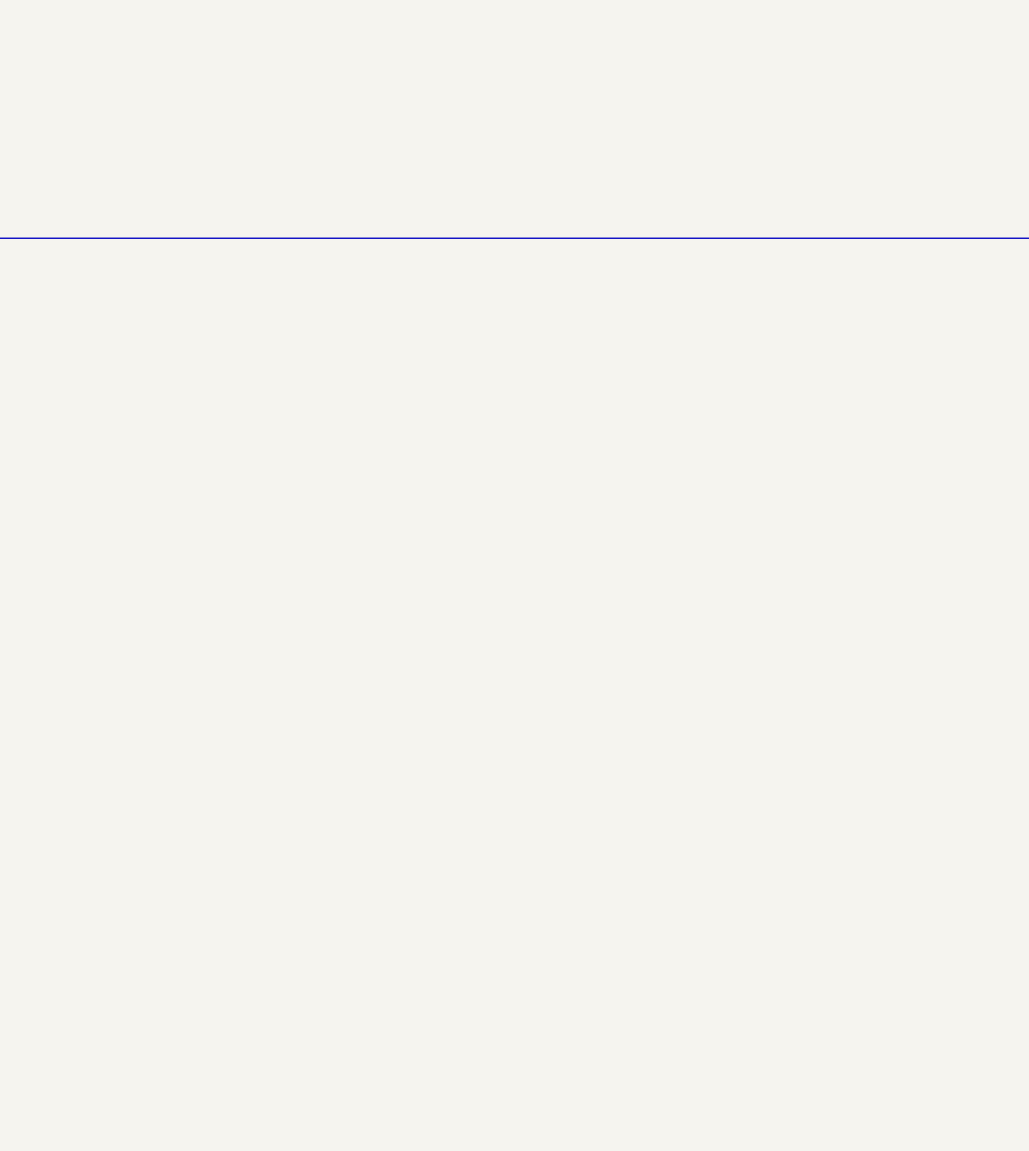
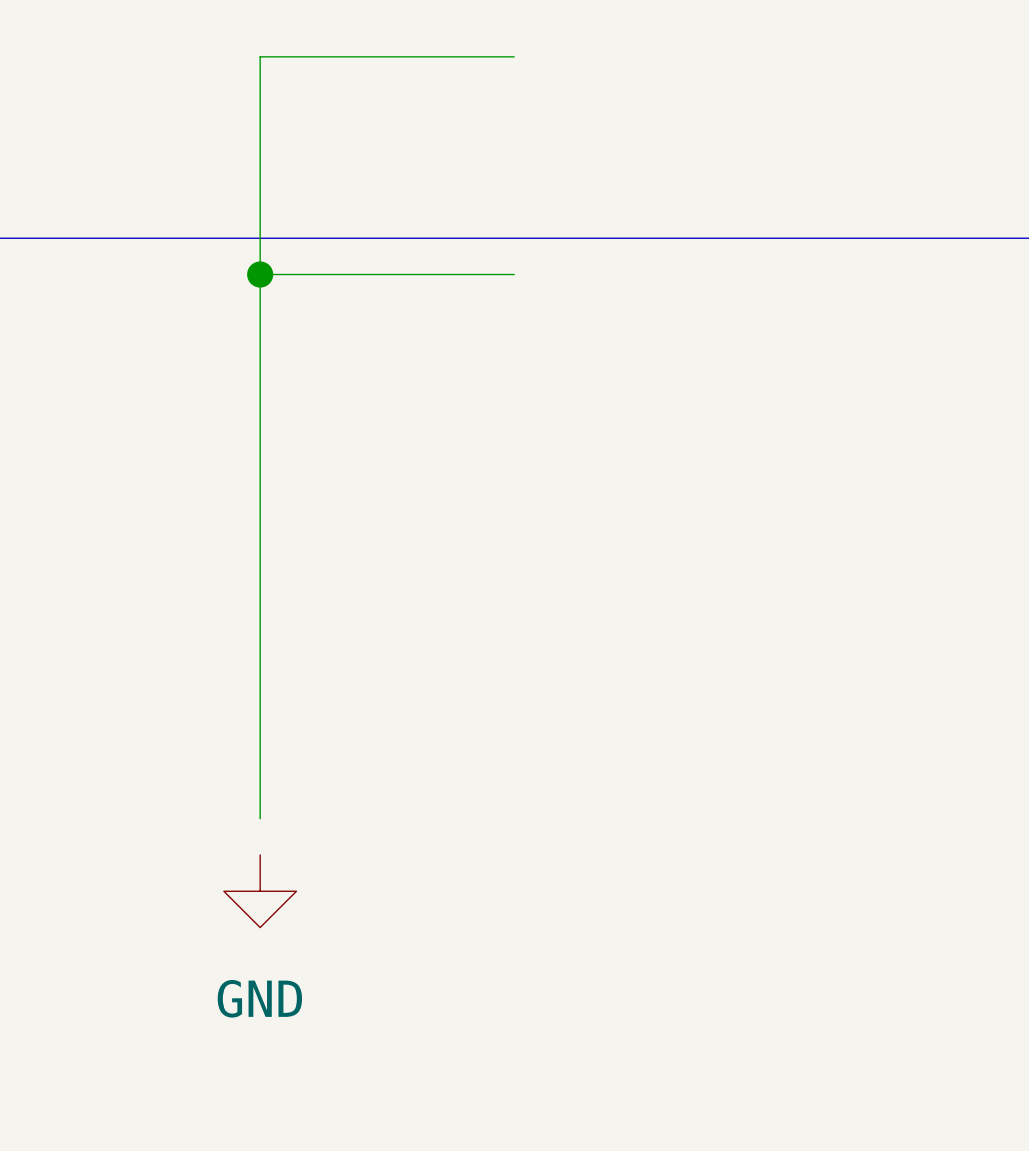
wire: none -> (514, 56) (260, 56) (260, 818)
wire: none -> (260, 274) (514, 274)
junction: none -> (260, 274)
power symbol: none -> GND (260, 891)

